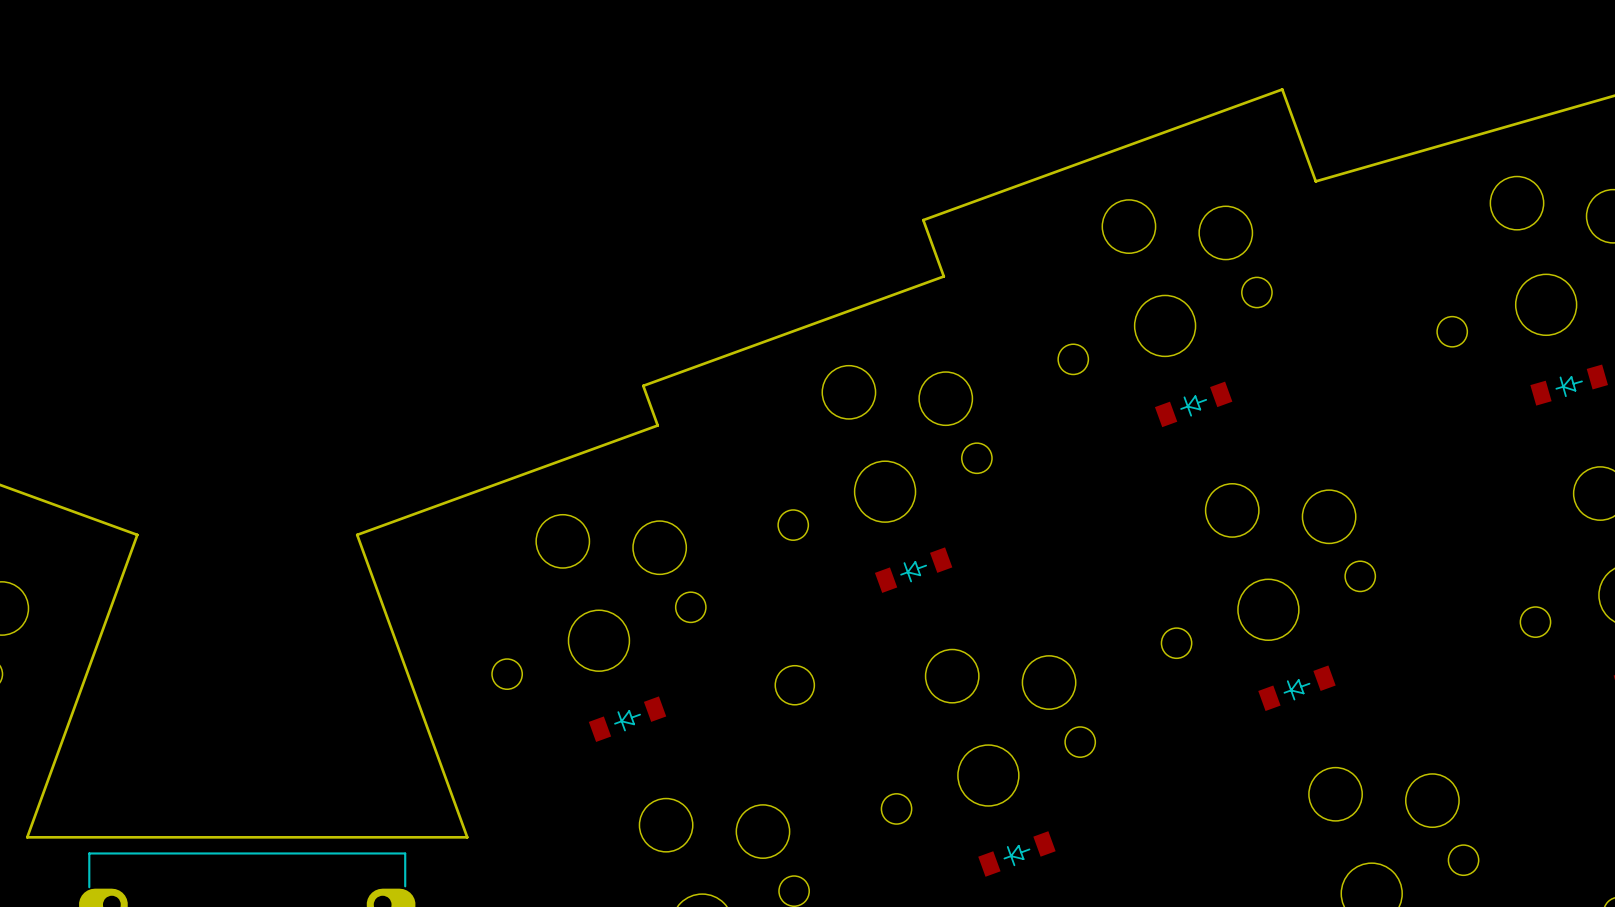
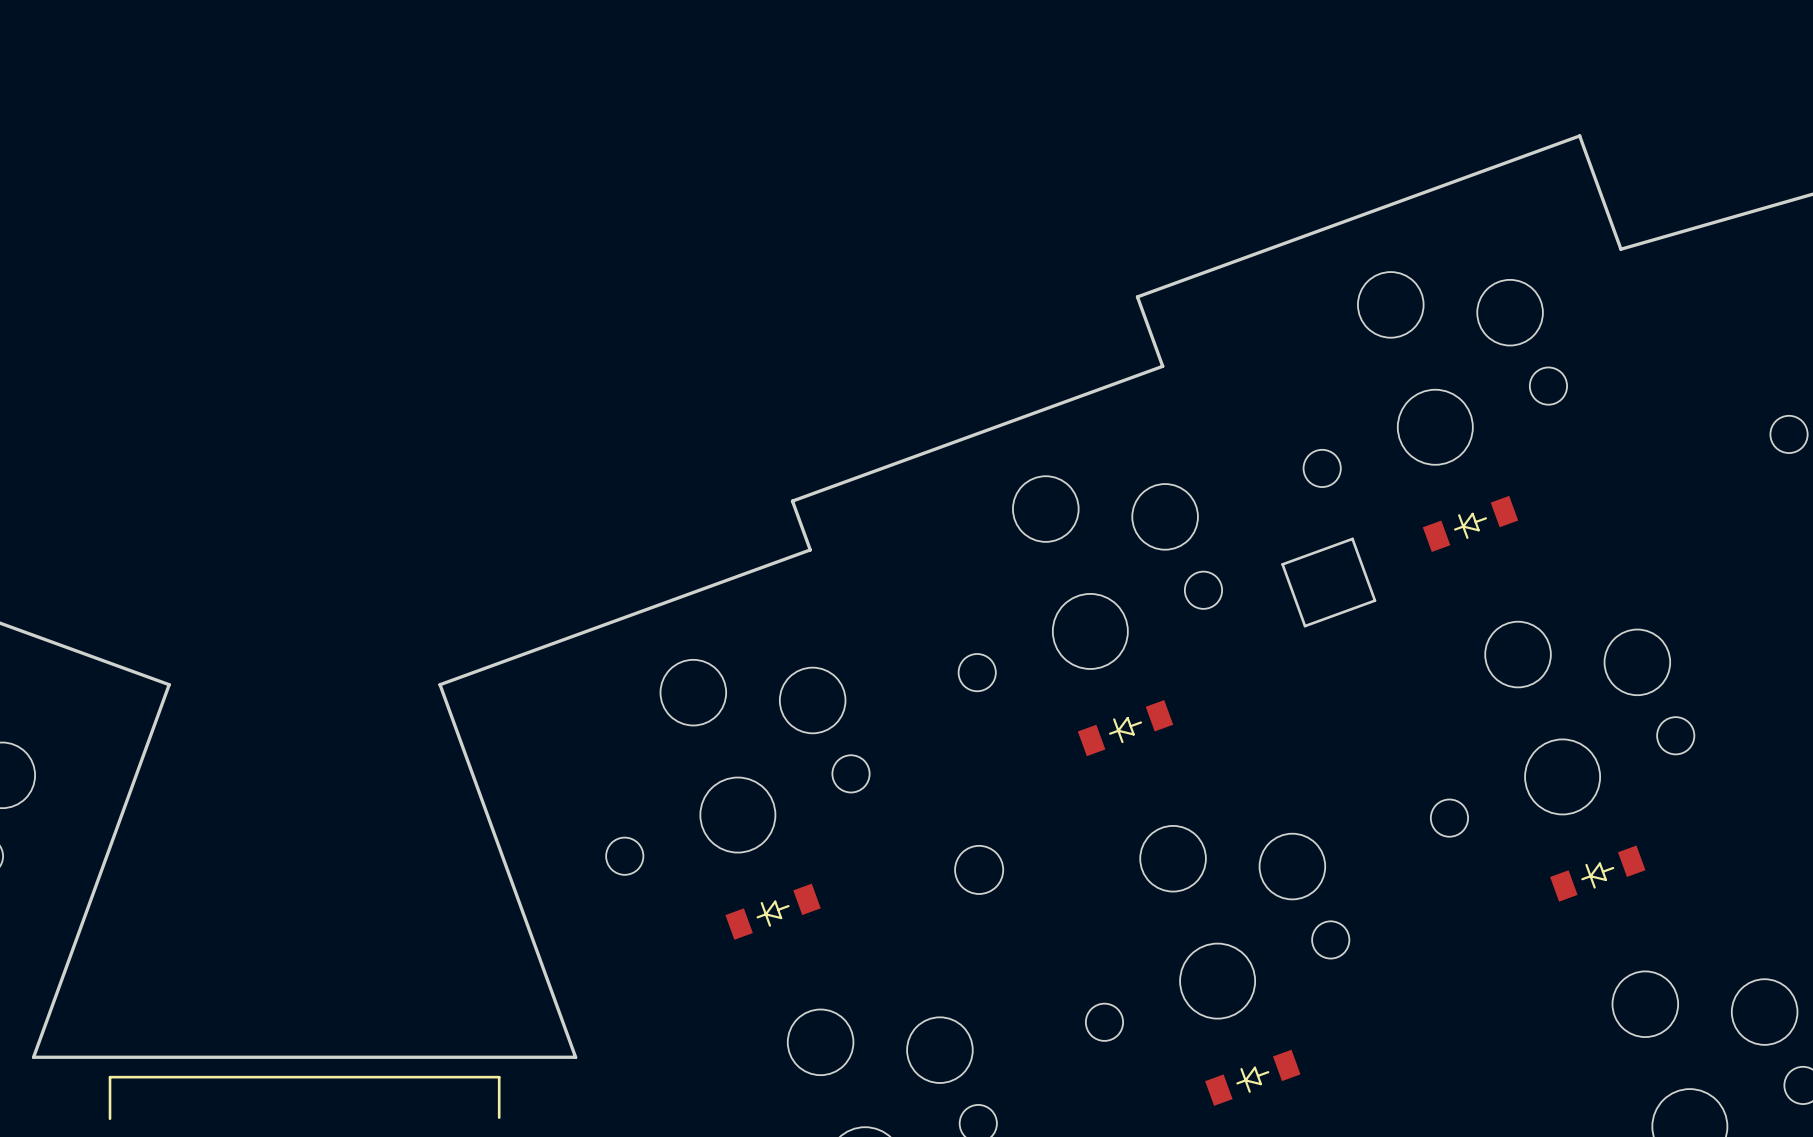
part: none -> (1328, 582)

